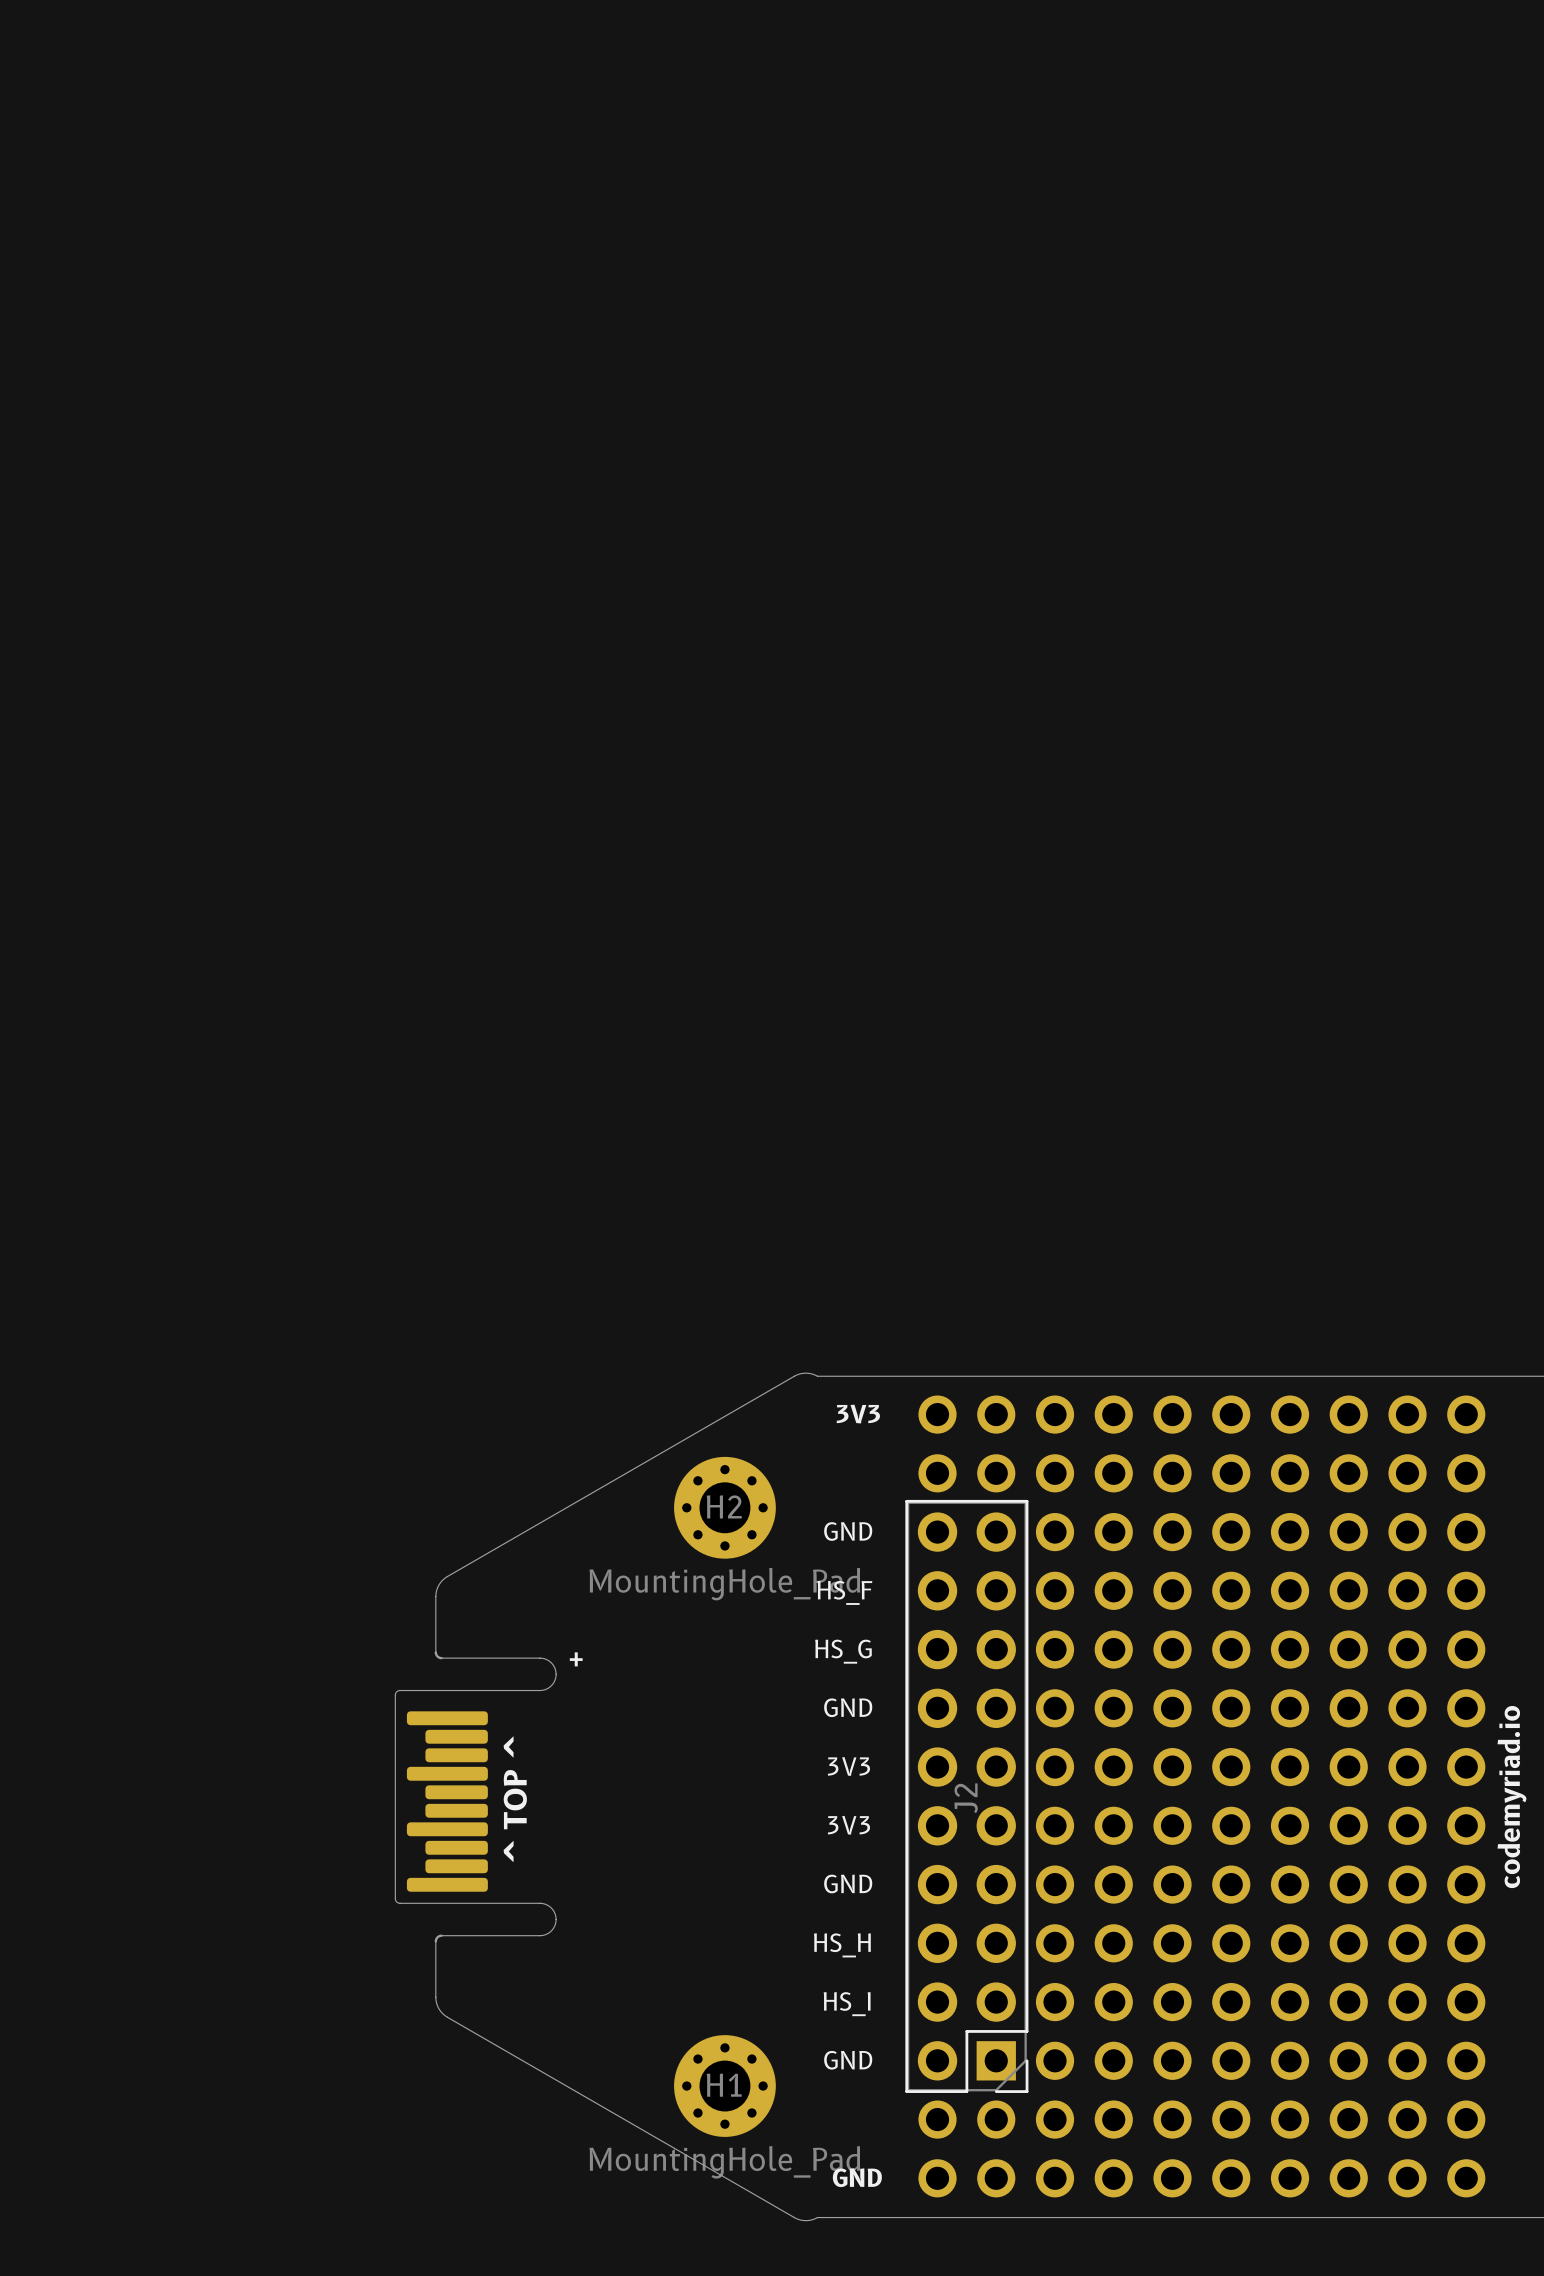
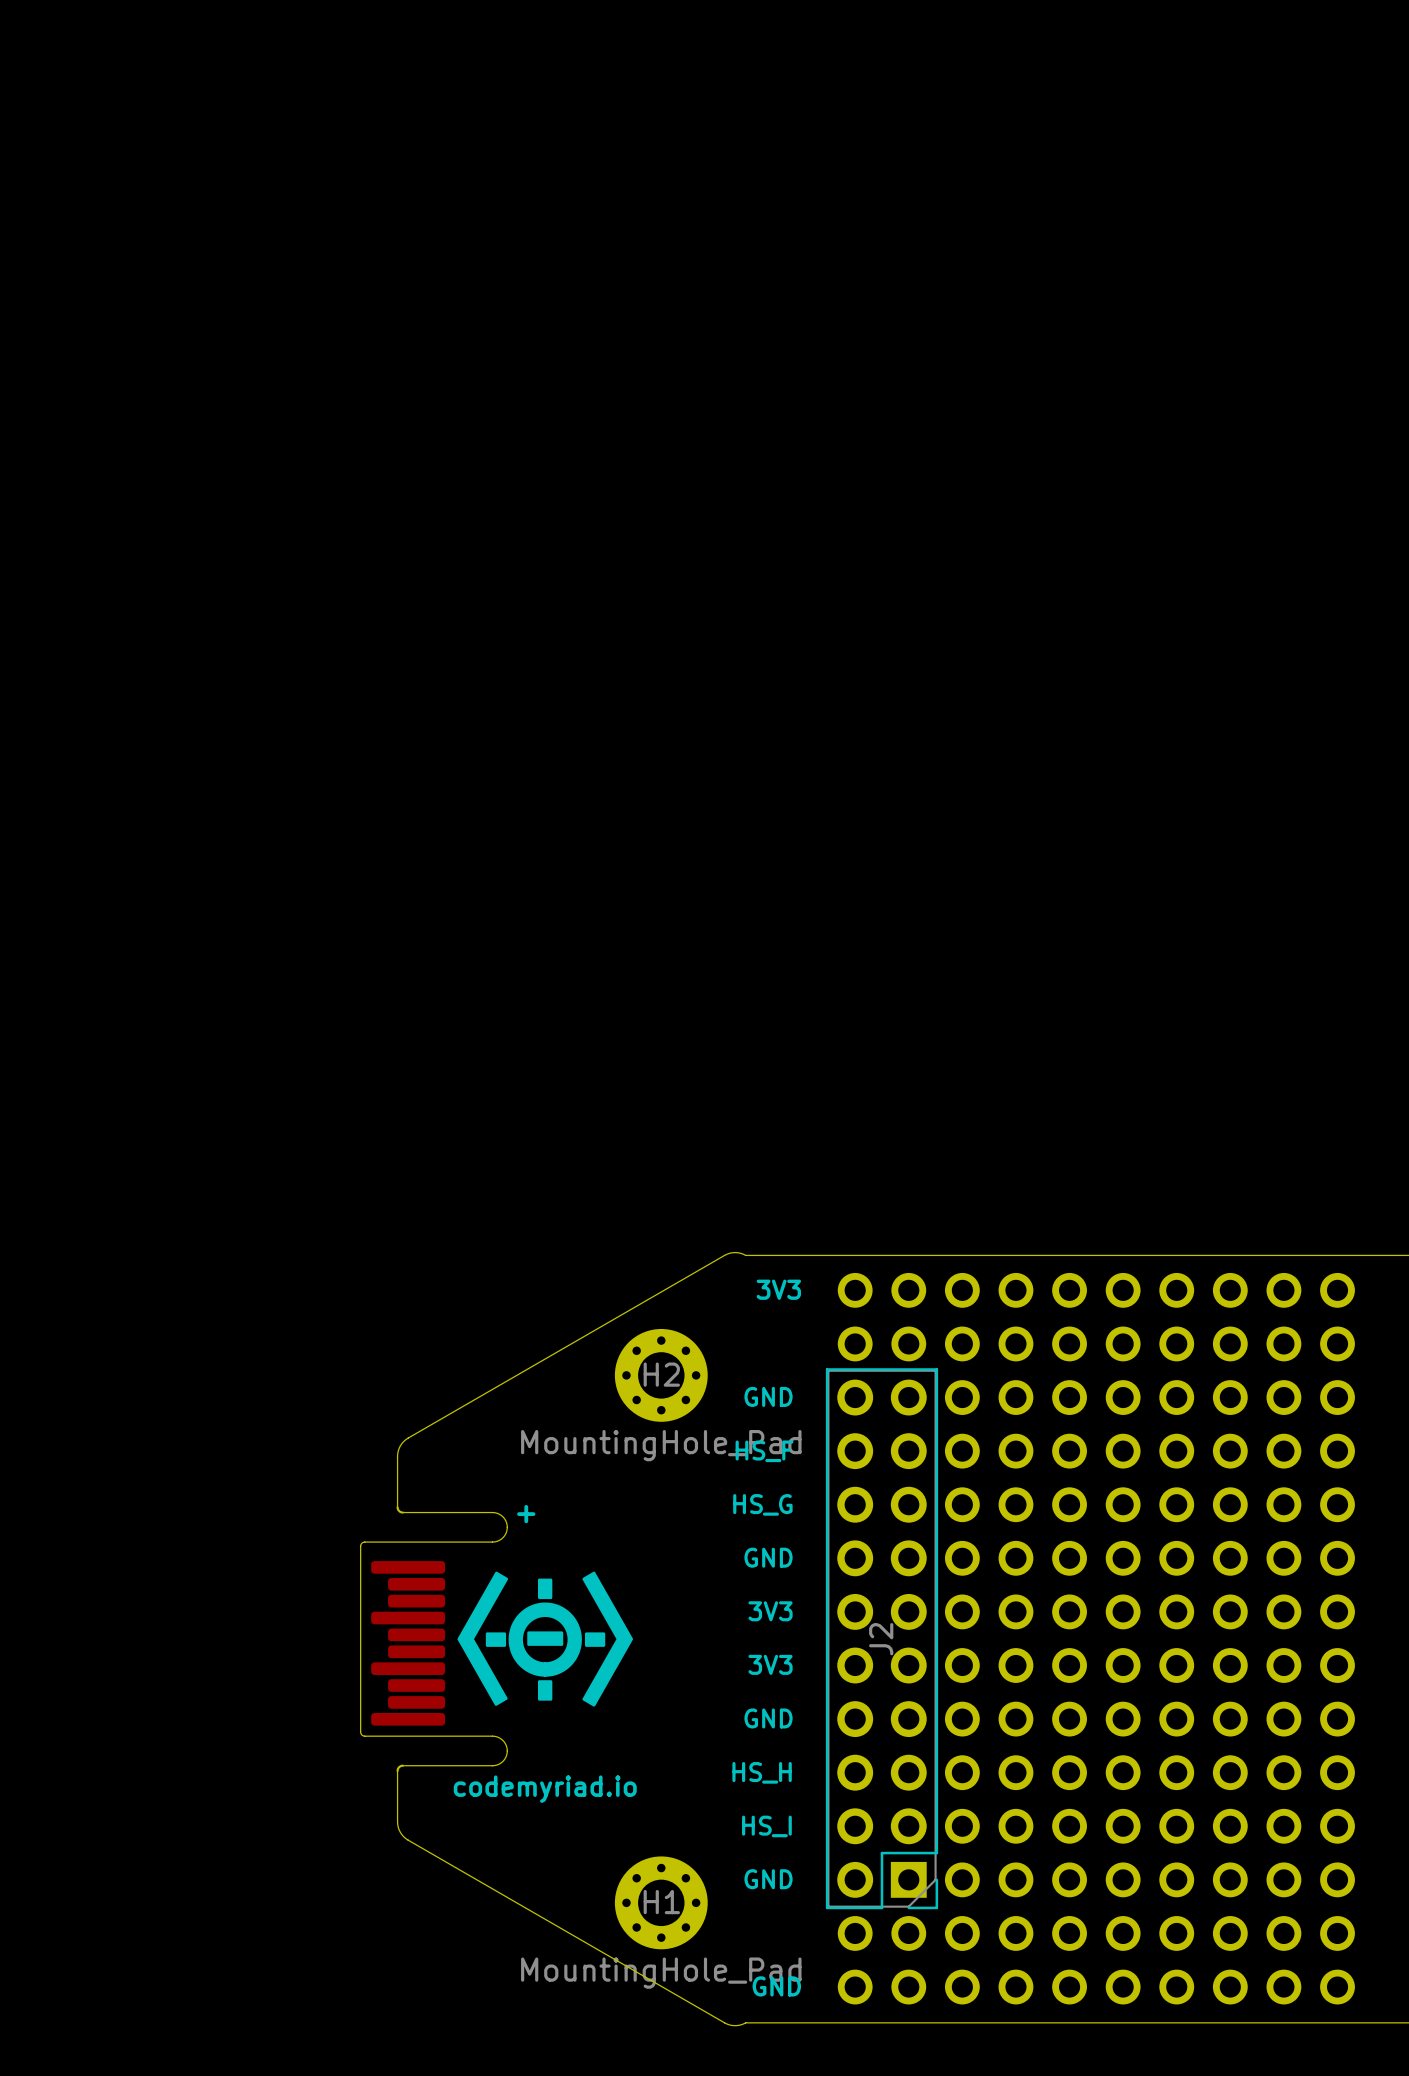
drawing: none -> [457, 1571, 634, 1707]
text: codemyriad.io (1511, 1797) -> none
part text: ^ TOP ^ (515, 1799) -> none
text: none -> codemyriad.io (545, 1789)

